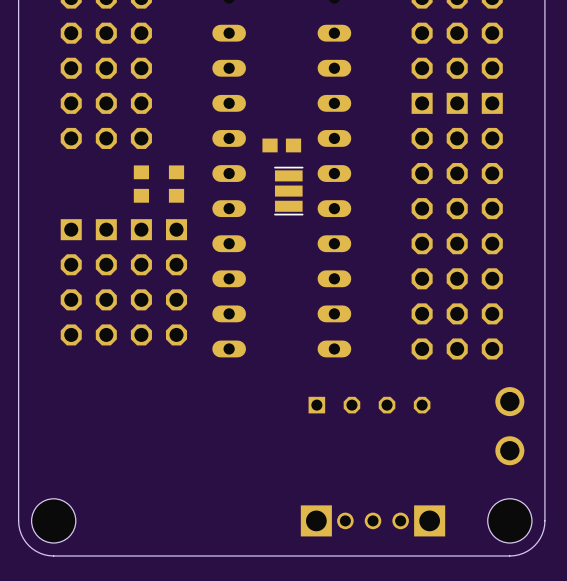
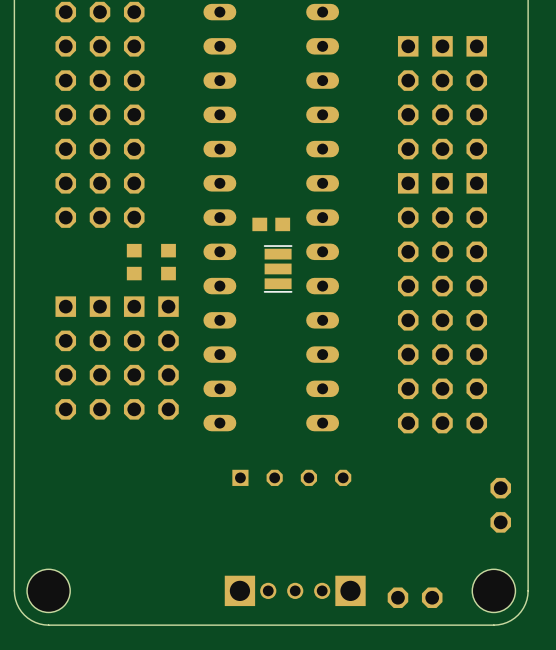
part: (509, 401) -> none
part position: (369, 405) -> (291, 477)
part: none -> (500, 488)
part footprint: [495, 436, 525, 466] -> [490, 512, 511, 533]
part position: (373, 520) -> (295, 590)
part: none -> (397, 597)
part: none -> (432, 597)

